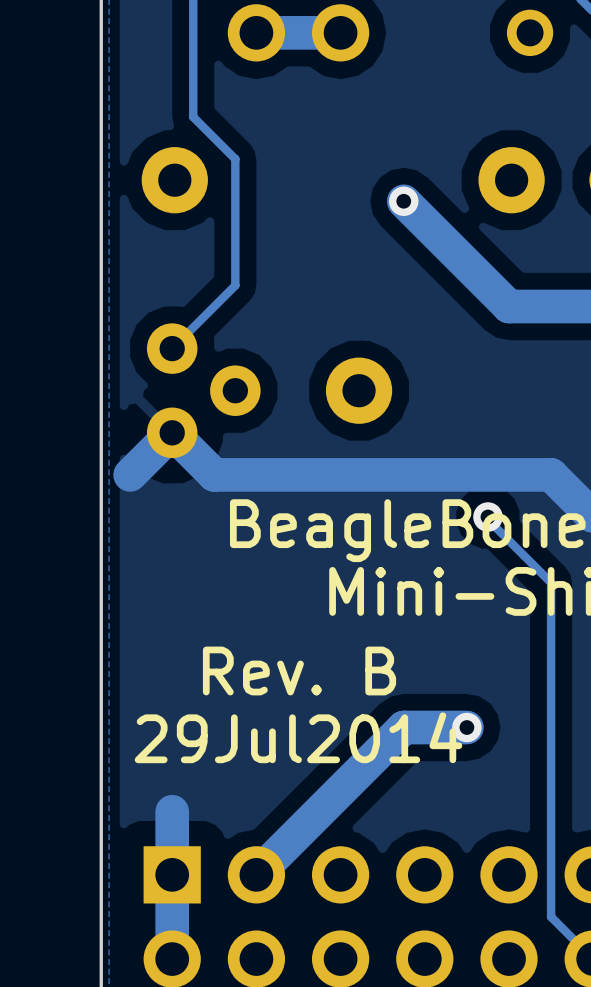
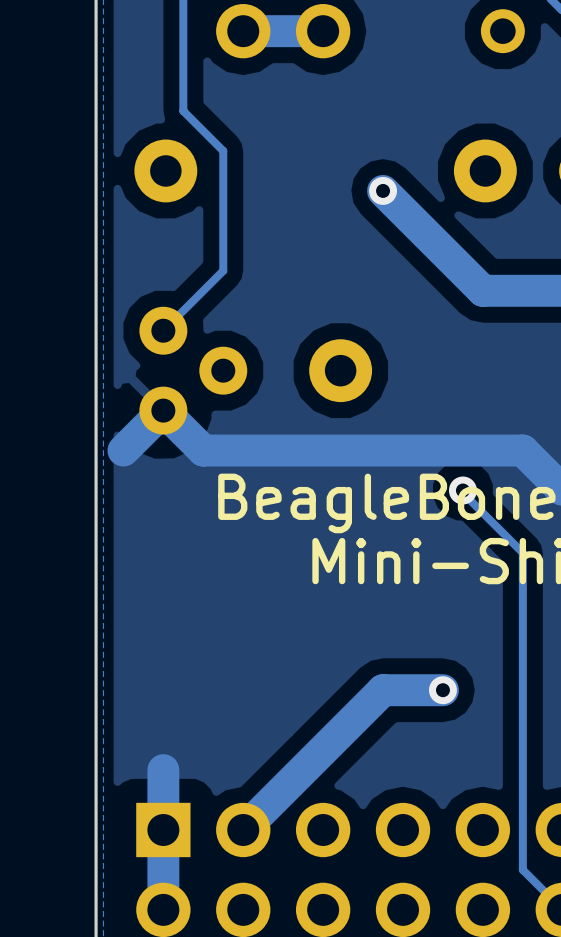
text: Rev. B (299, 670) -> none
text: 29Jul2014 (298, 737) -> none

